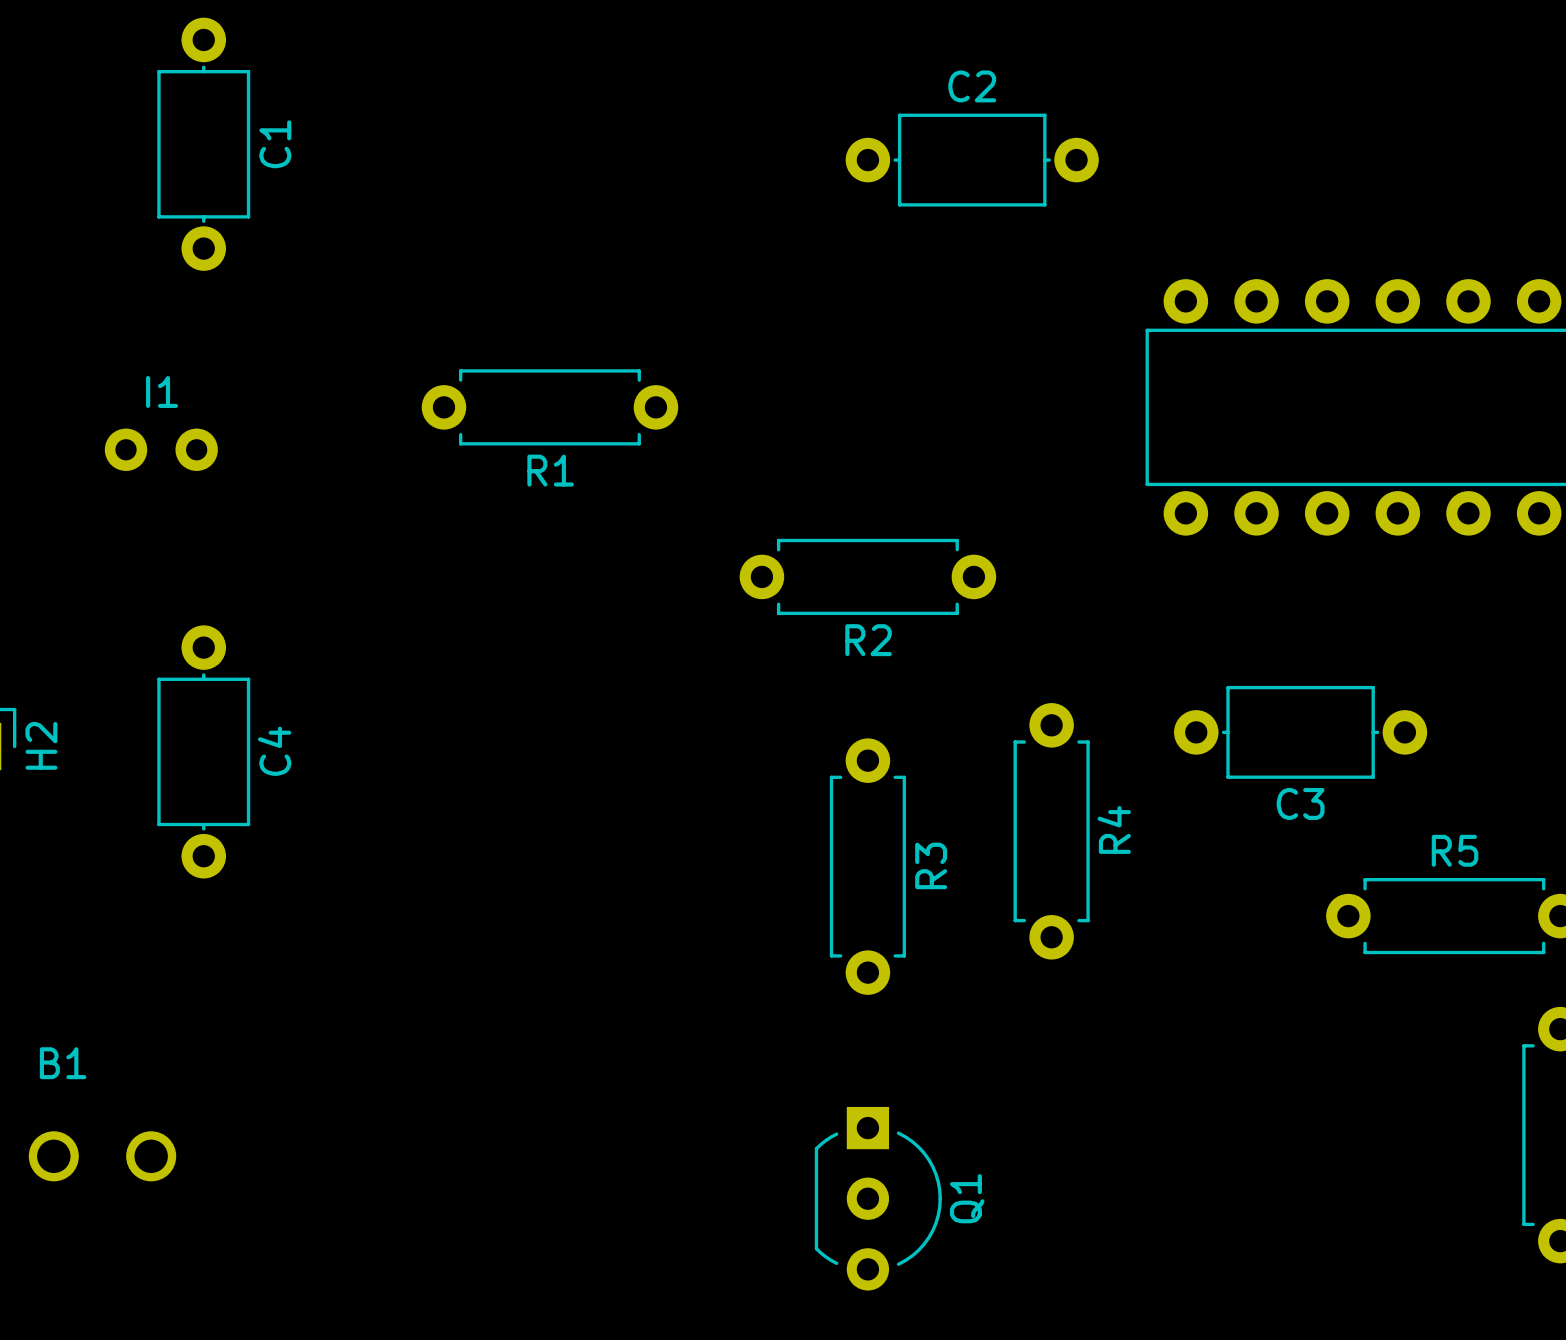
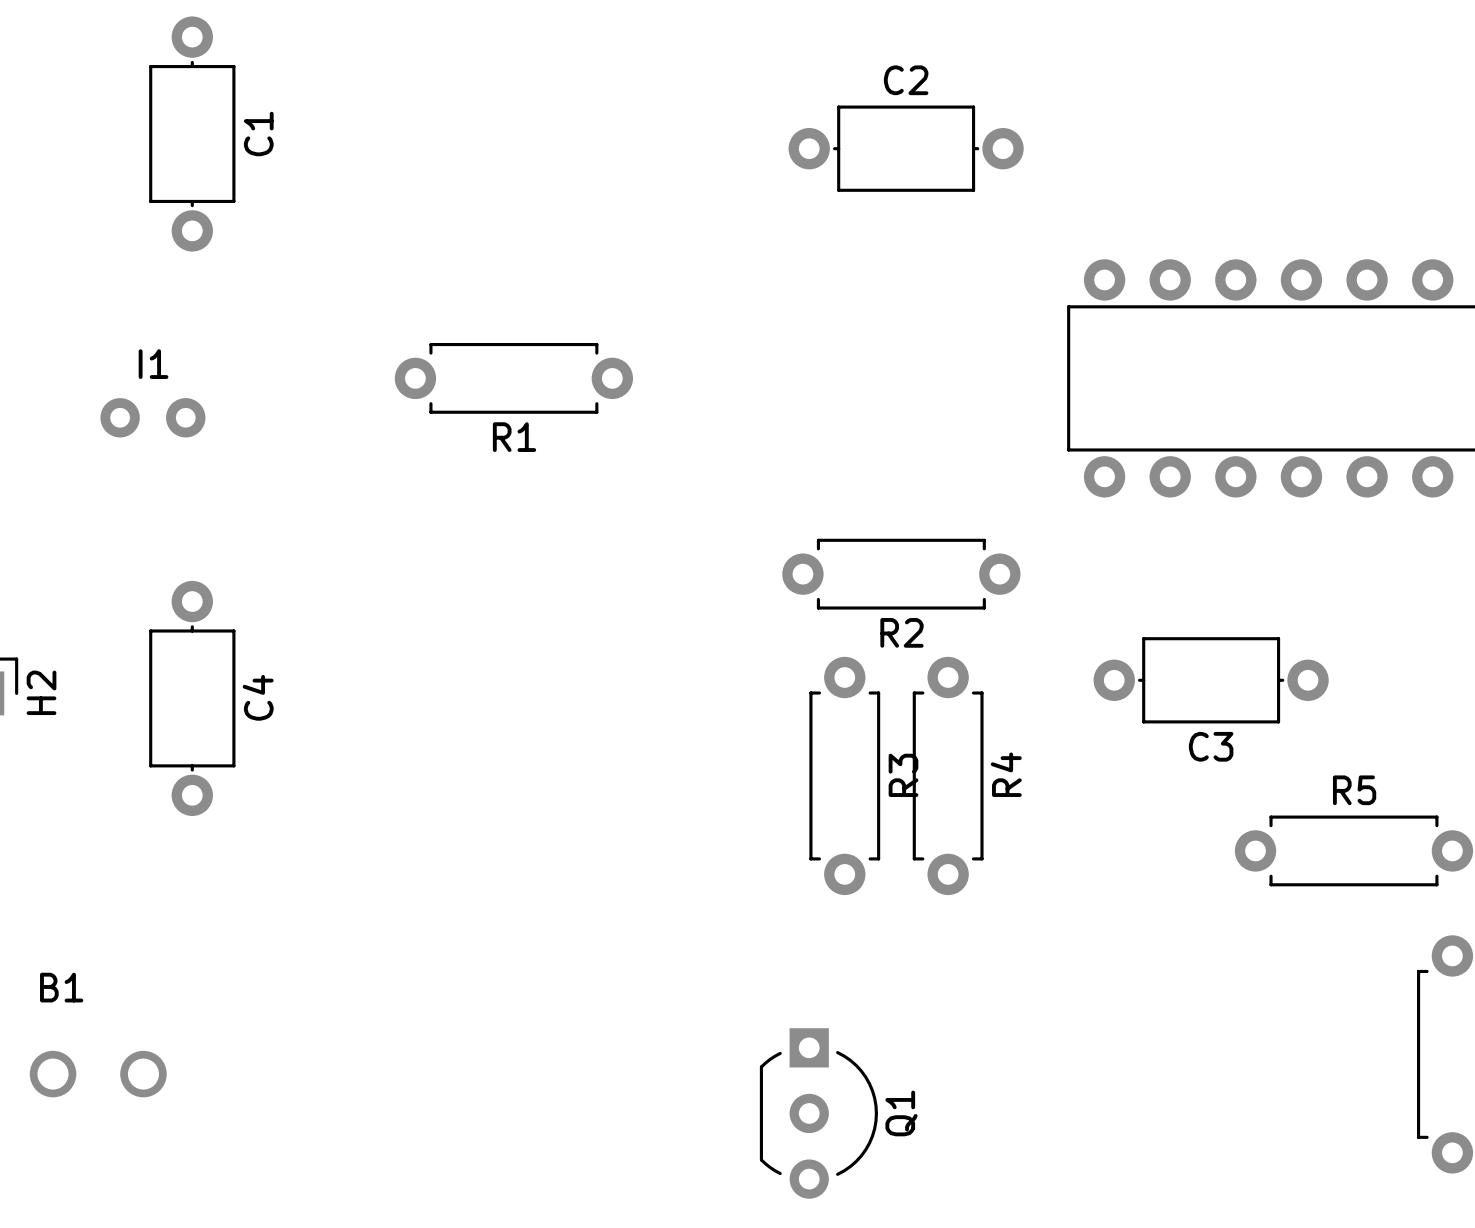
R2 position: (867, 576) -> (901, 574)
R4 position: (1051, 831) -> (948, 775)
R3 position: (867, 866) -> (844, 775)

